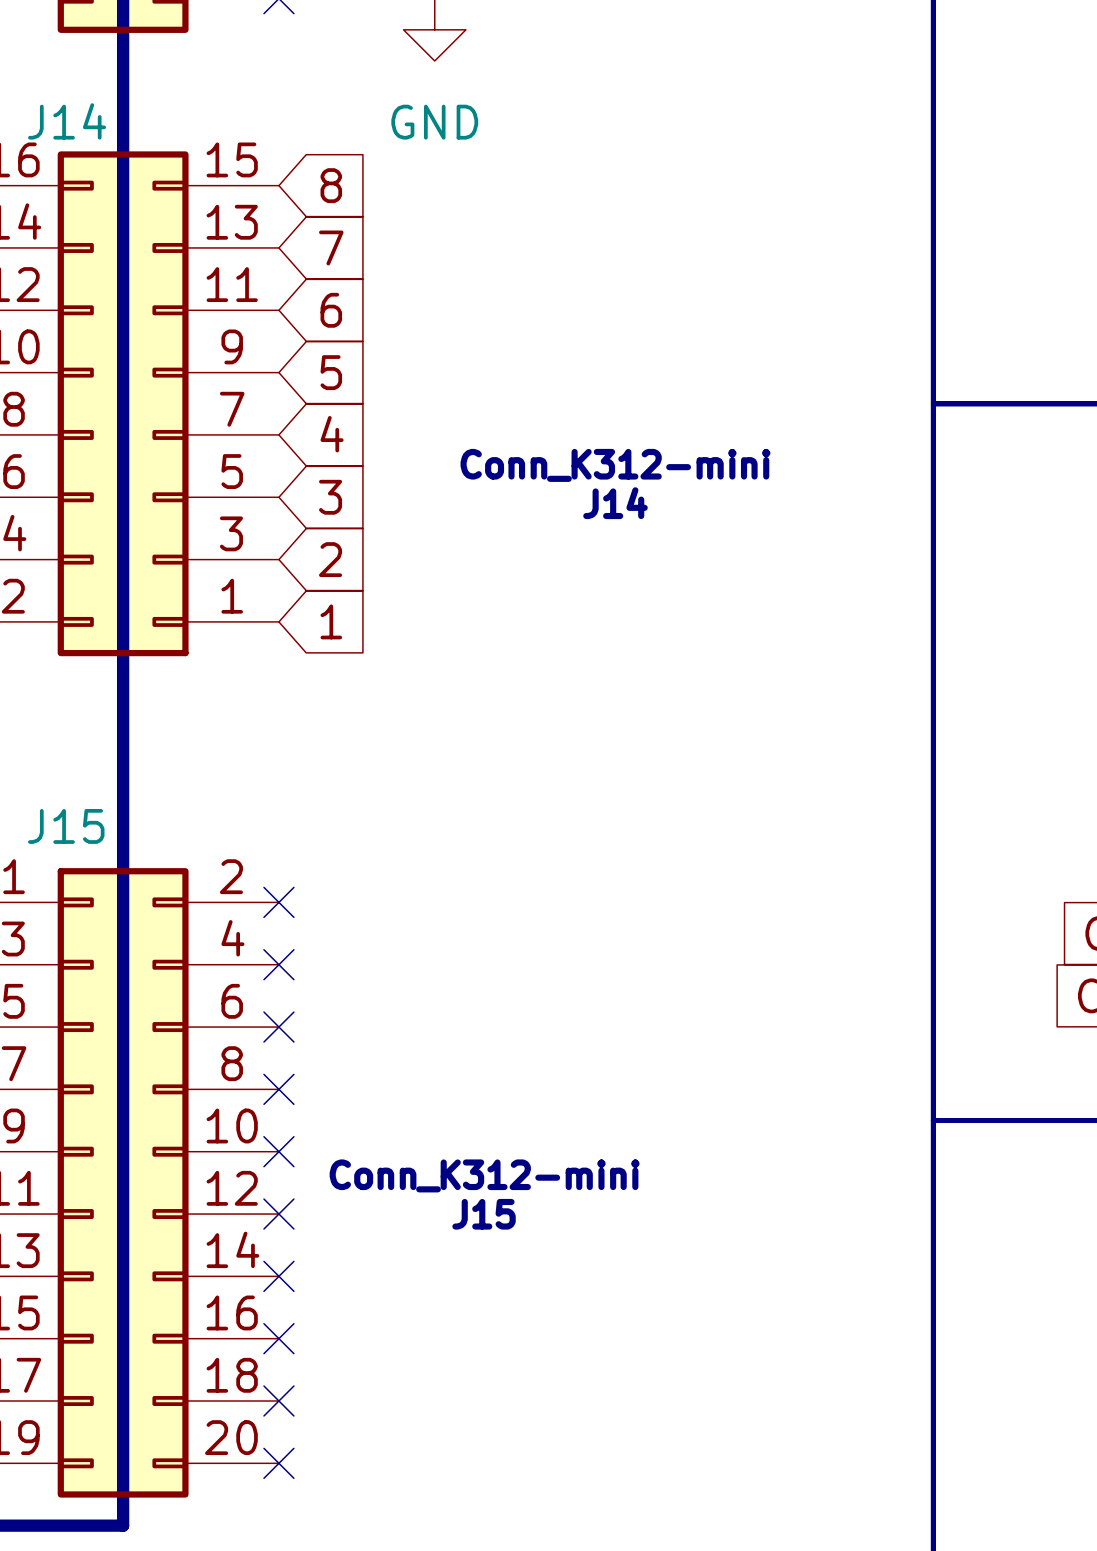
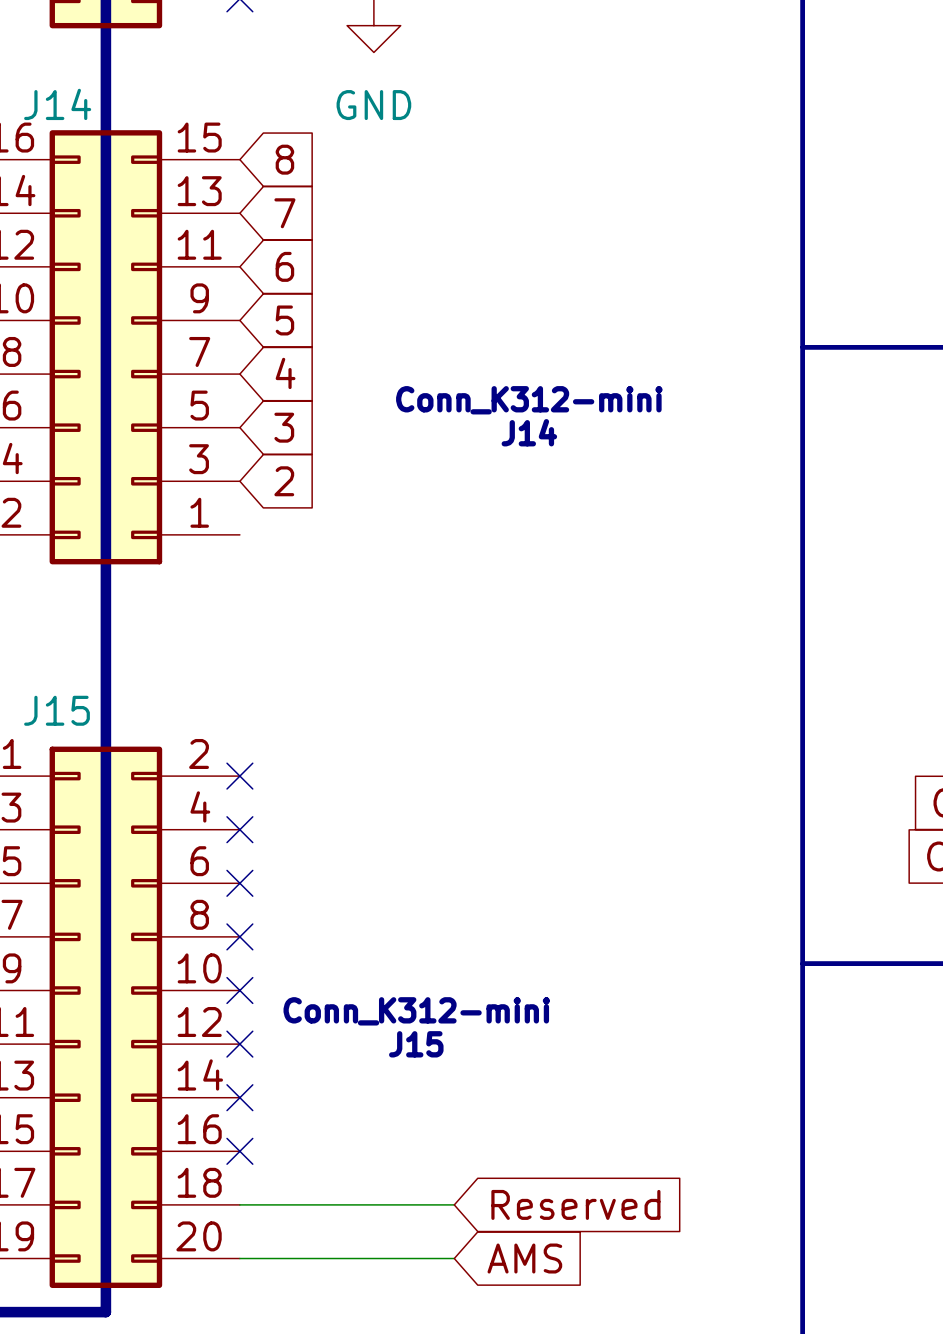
global label: 1 (331, 621) -> none
wire: none -> (239, 1204) (454, 1204)
no-connect mark: (278, 1401) -> none
global label: none -> Reserved (575, 1204)
wire: none -> (239, 1258) (454, 1258)
no-connect mark: (278, 1463) -> none
global label: none -> AMS (524, 1258)

